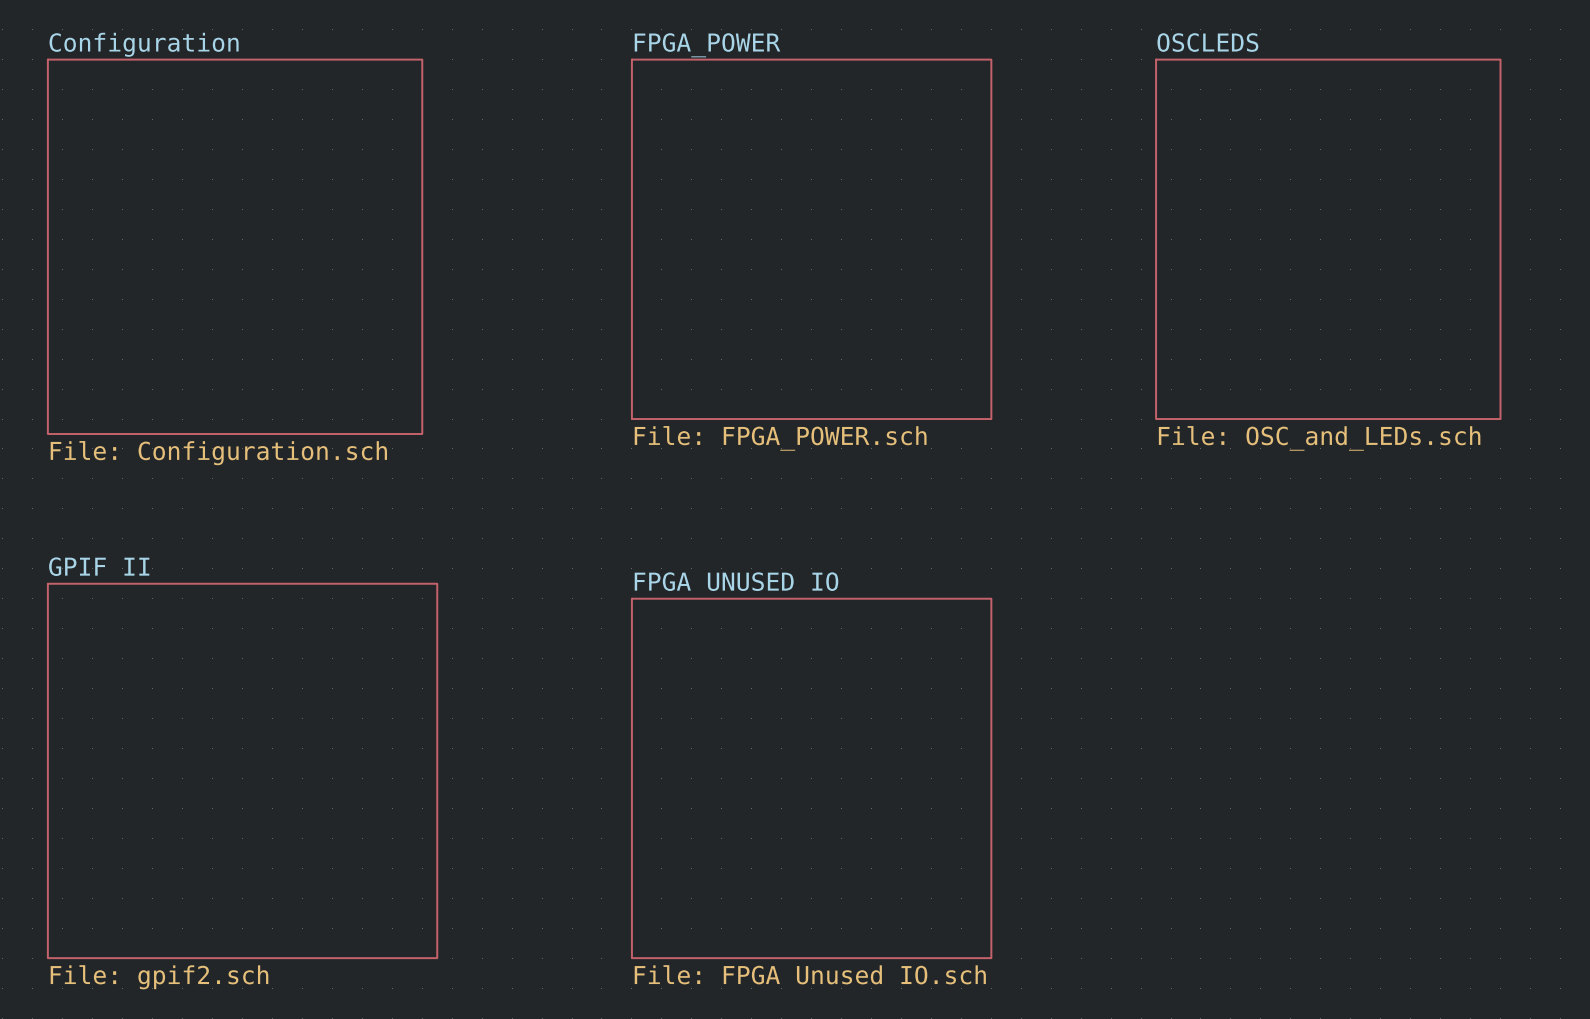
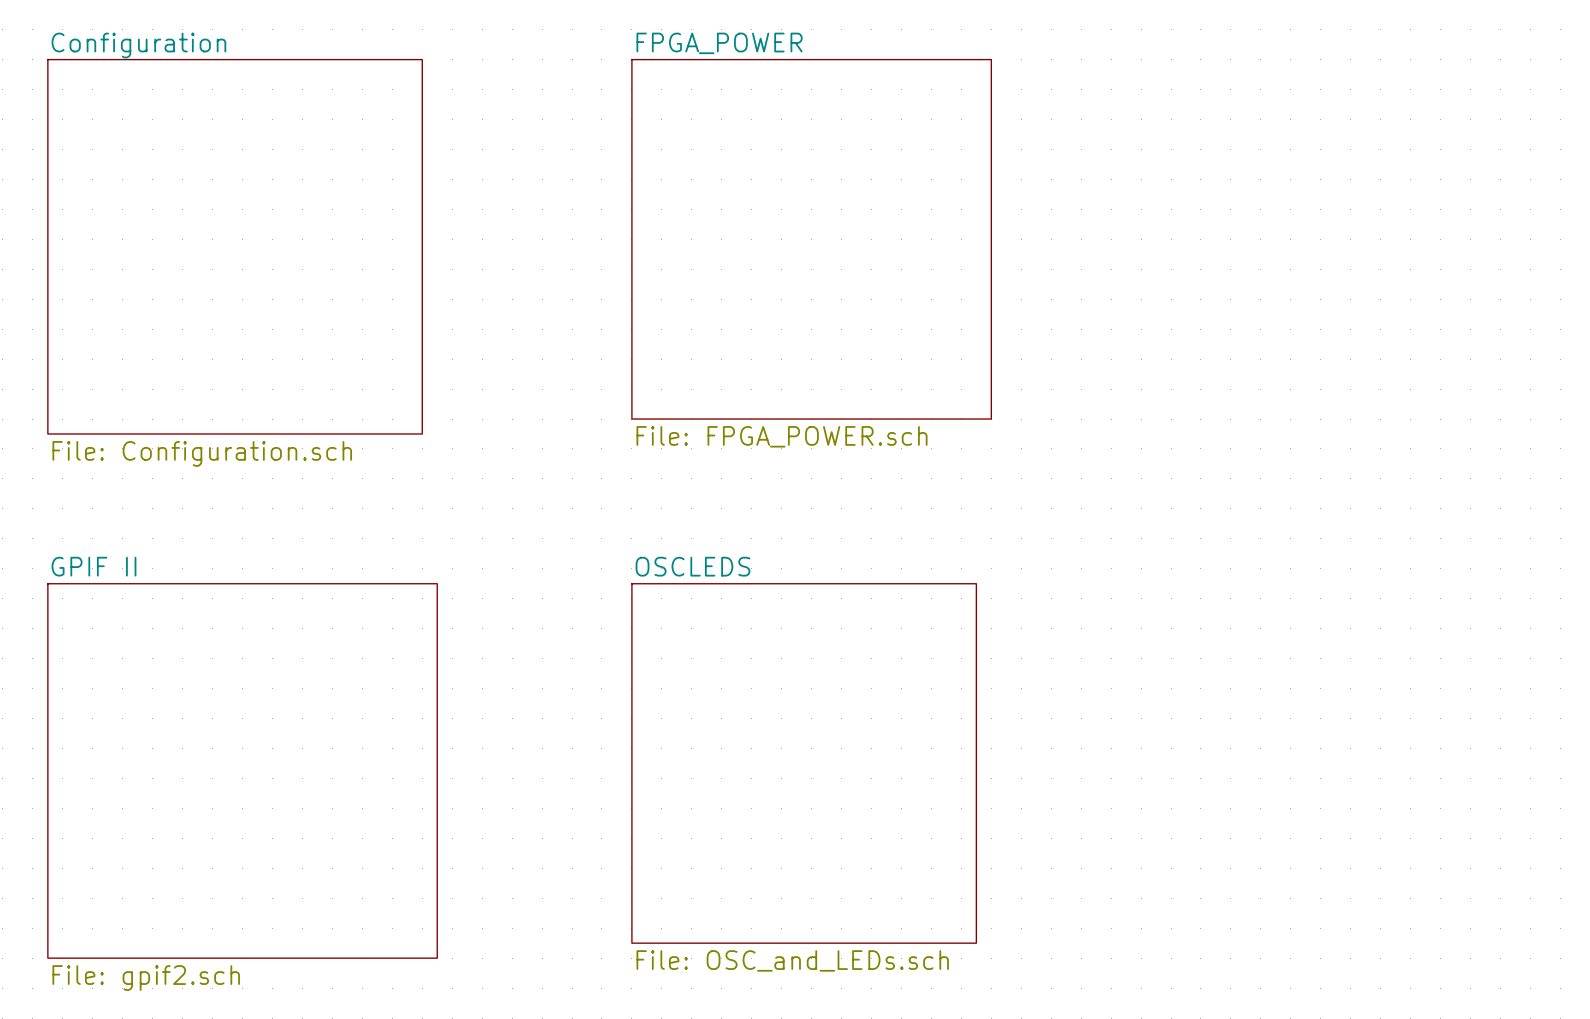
sheet OSCLEDS: File: OSC_and_LEDs.sch (1328, 239) -> none
sheet OSCLEDS: none -> File: OSC_and_LEDs.sch (804, 763)
sheet FPGA UNUSED IO: File: FPGA Unused IO.sch (811, 778) -> none

